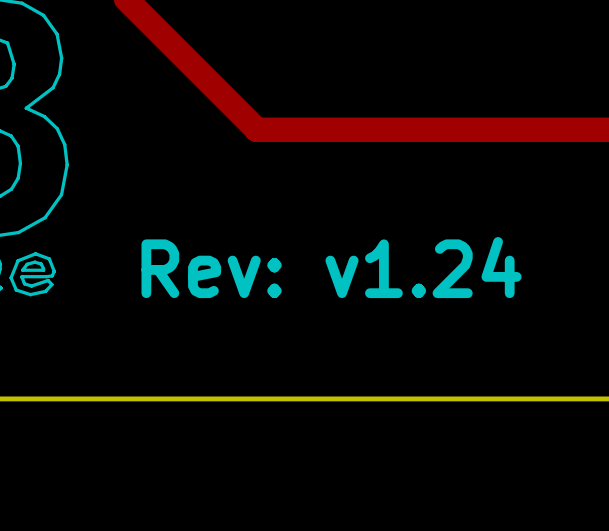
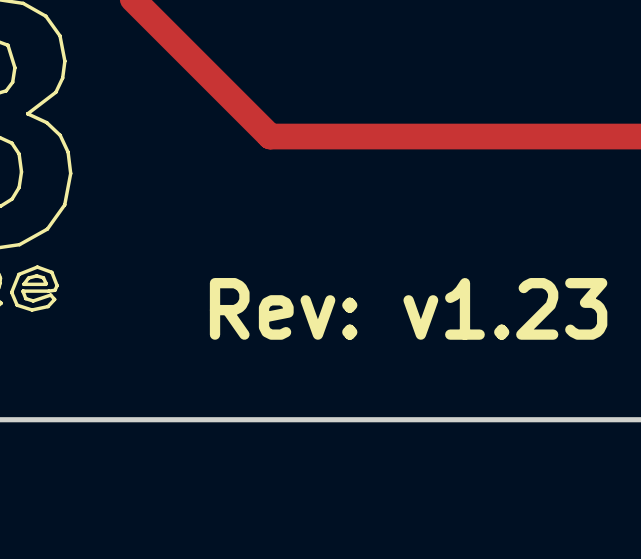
text: Rev: v1.24 (331, 267) -> Rev: v1.23 (408, 308)

